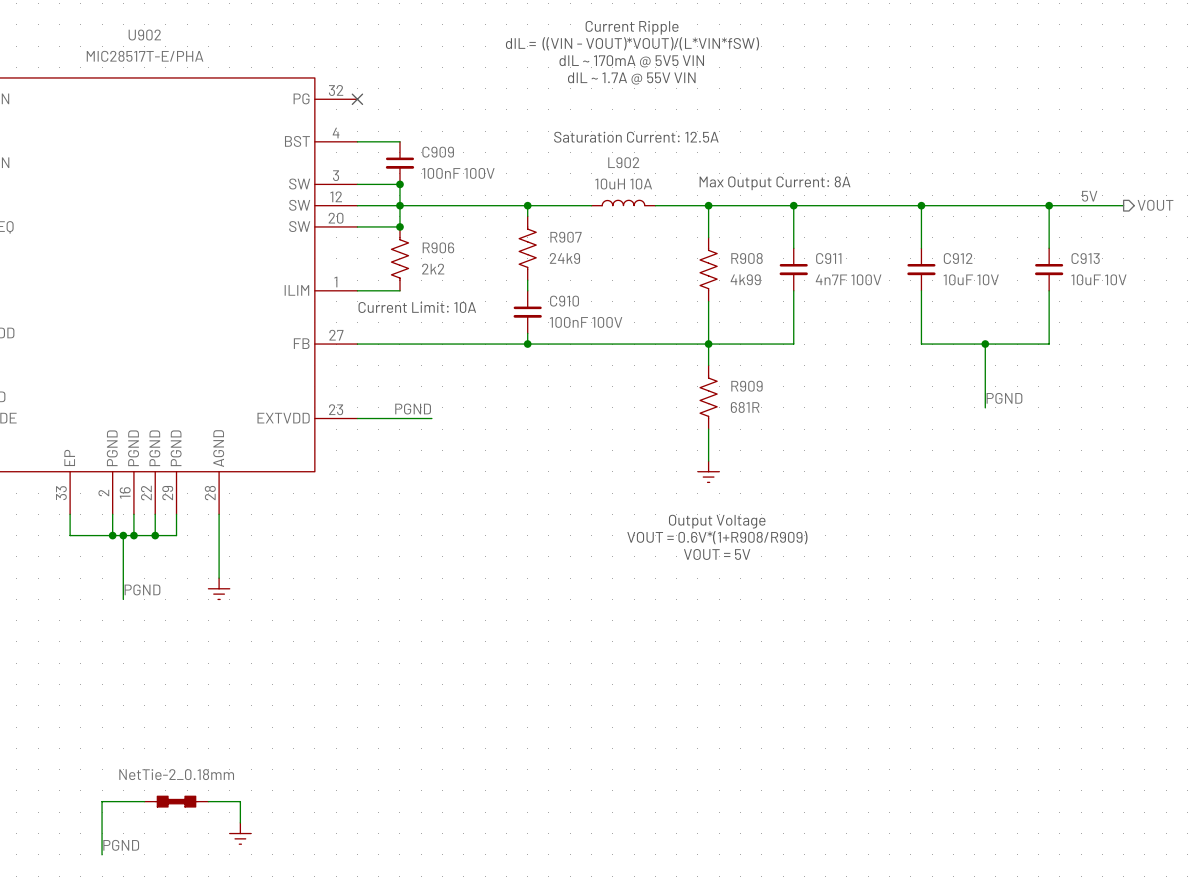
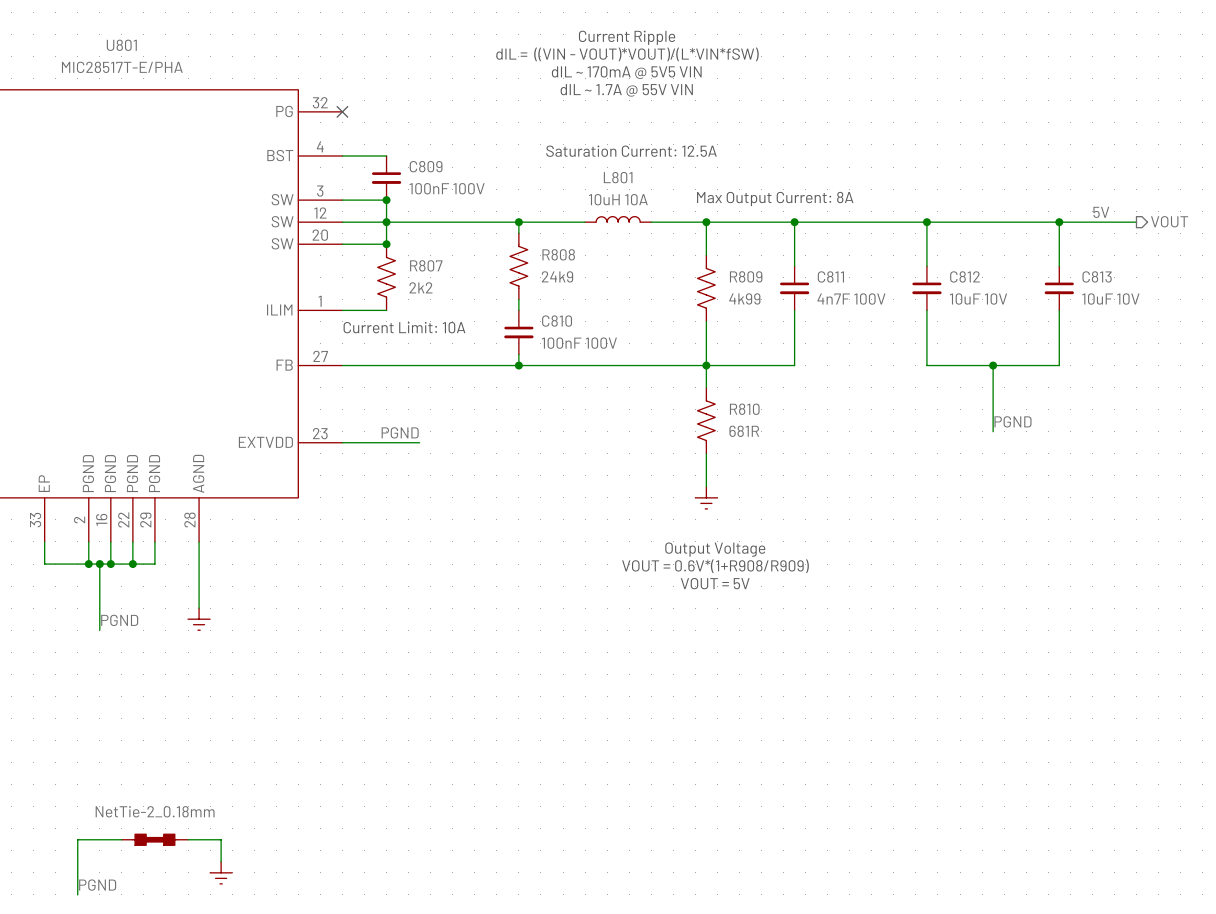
U902 name: U902 (144, 35) -> U801 (121, 45)
C909 name: C909 (438, 152) -> C809 (426, 166)
L902 name: L902 (623, 162) -> L801 (618, 177)
R907 name: R907 (566, 237) -> R808 (558, 254)
R906 name: R906 (438, 247) -> R807 (426, 265)
R908 name: R908 (747, 258) -> R809 (746, 276)
C911 name: C911 (828, 258) -> C811 (830, 276)
C912 name: C912 (958, 258) -> C812 (964, 276)
C913 name: C913 (1085, 258) -> C813 (1097, 276)
C910 name: C910 (564, 301) -> C810 (557, 321)
R909 name: R909 (746, 386) -> R810 (744, 409)

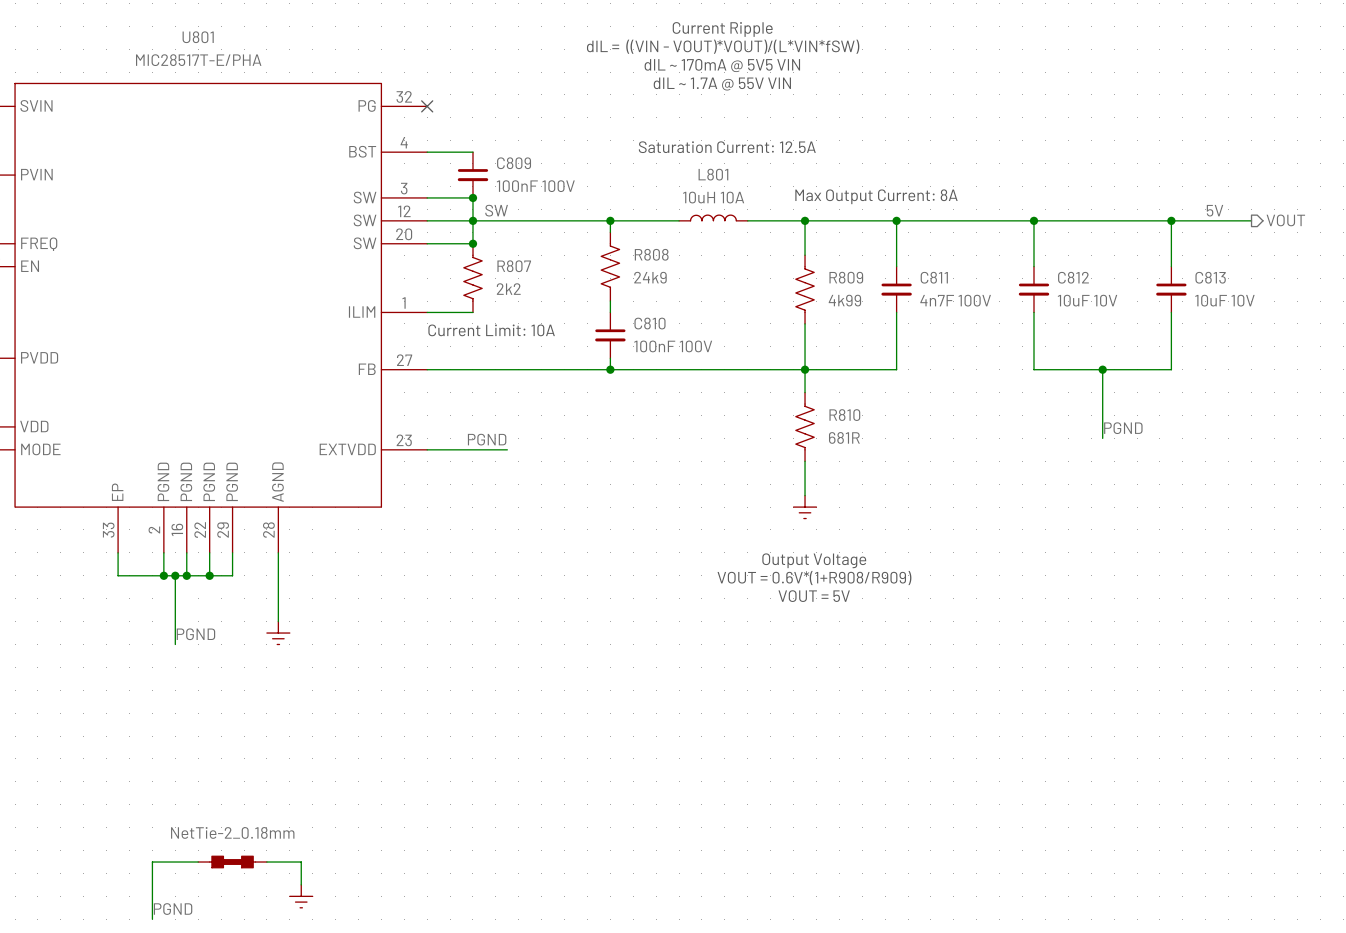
label: none -> SW (496, 210)

